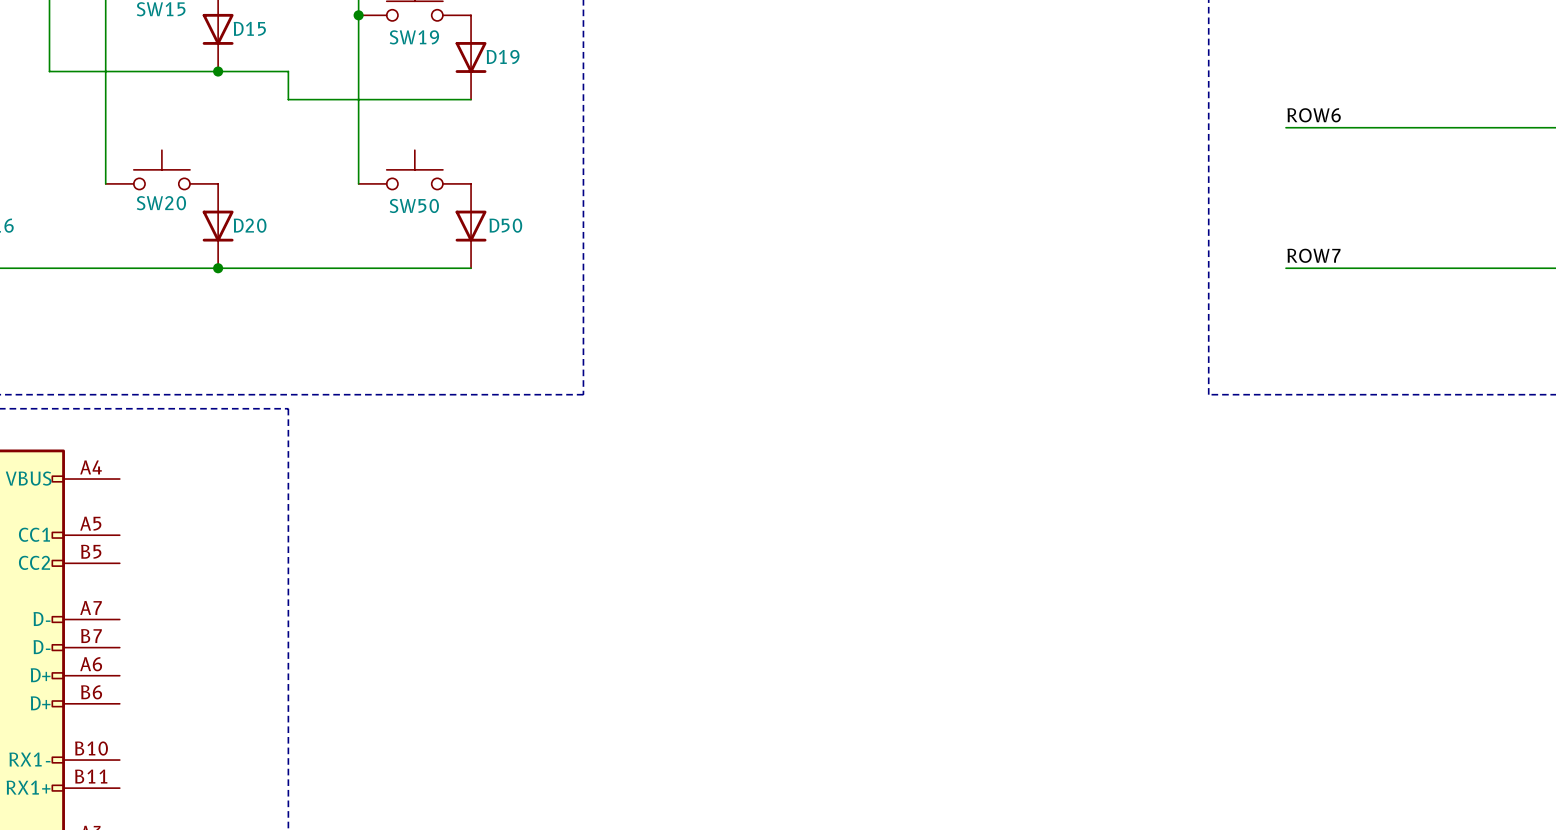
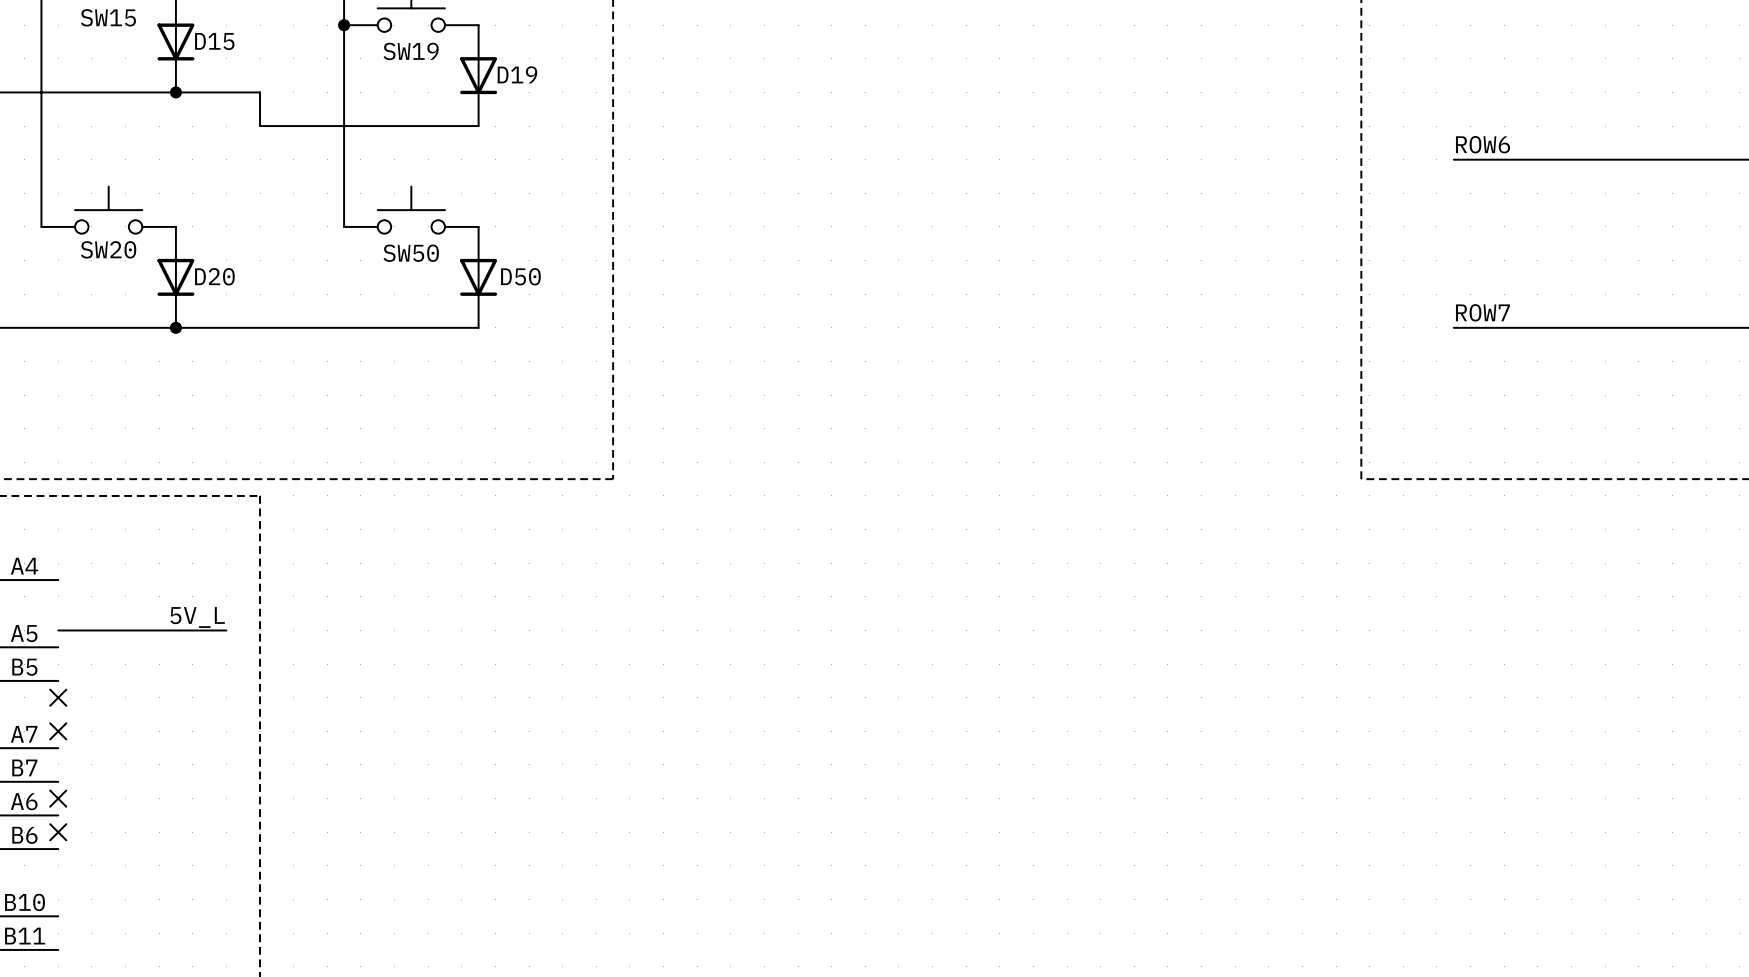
label: none -> 5V_L (197, 617)
wire: none -> (58, 630) (226, 630)
no-connect mark: none -> (58, 697)
no-connect mark: none -> (58, 731)
no-connect mark: none -> (58, 798)
no-connect mark: none -> (58, 832)

